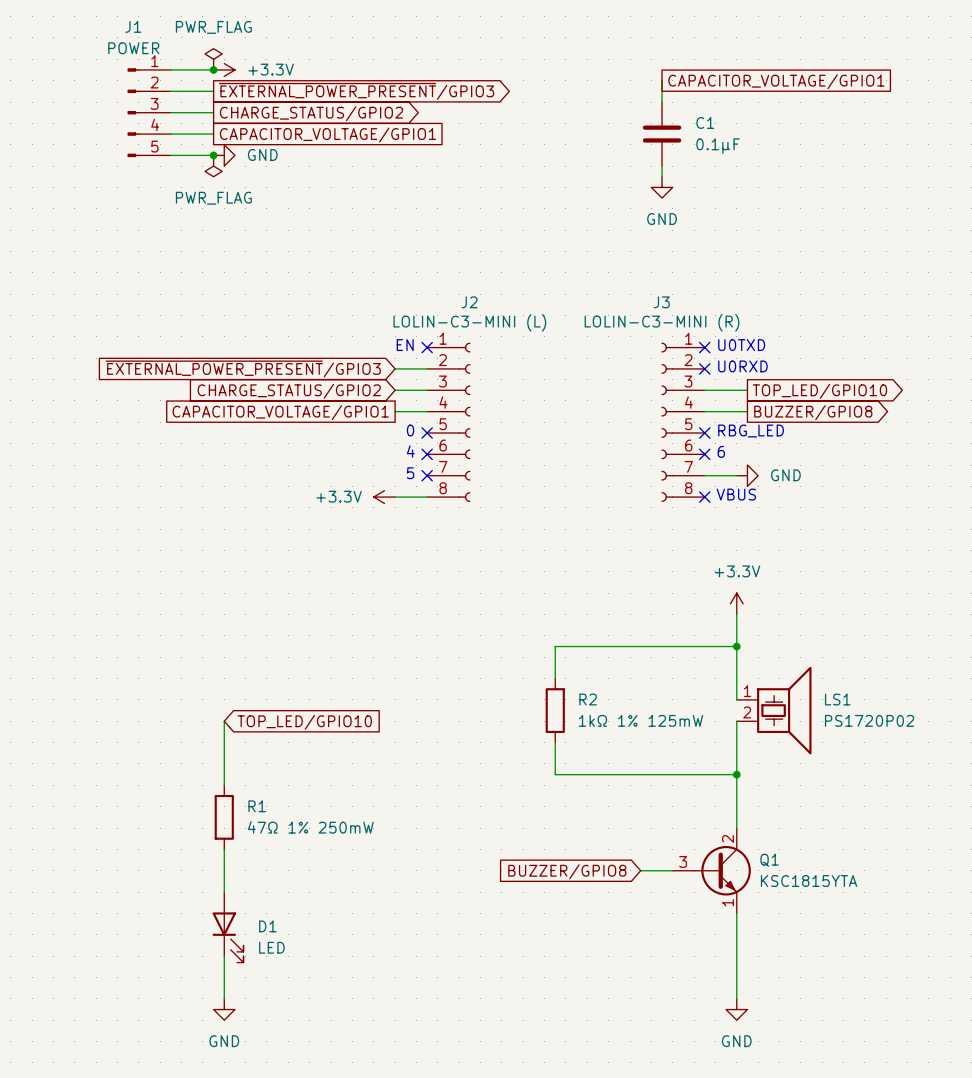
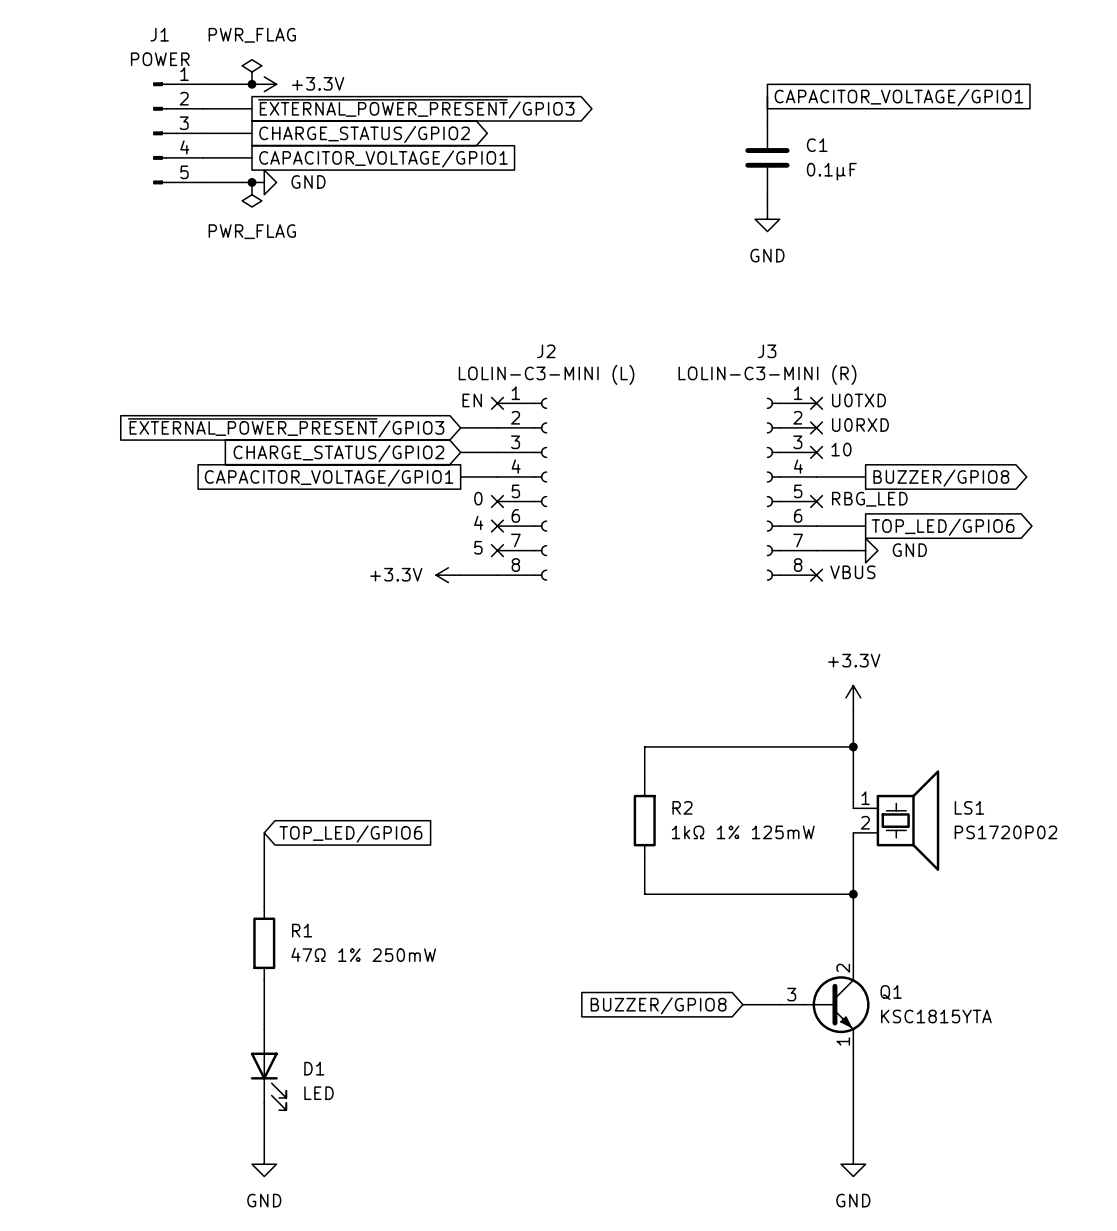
text: none -> 10 (841, 449)
wire: (704, 390) (747, 390) -> (816, 526) (865, 526)
no-connect mark: none -> (816, 452)
global label: TOP_LED/GPIO10 (819, 391) -> none
text: 6 (721, 451) -> none
no-connect mark: (704, 454) -> none
global label: none -> TOP_LED/GPIO6 (943, 527)
global label: TOP_LED/GPIO10 (304, 722) -> TOP_LED/GPIO6 (350, 834)

